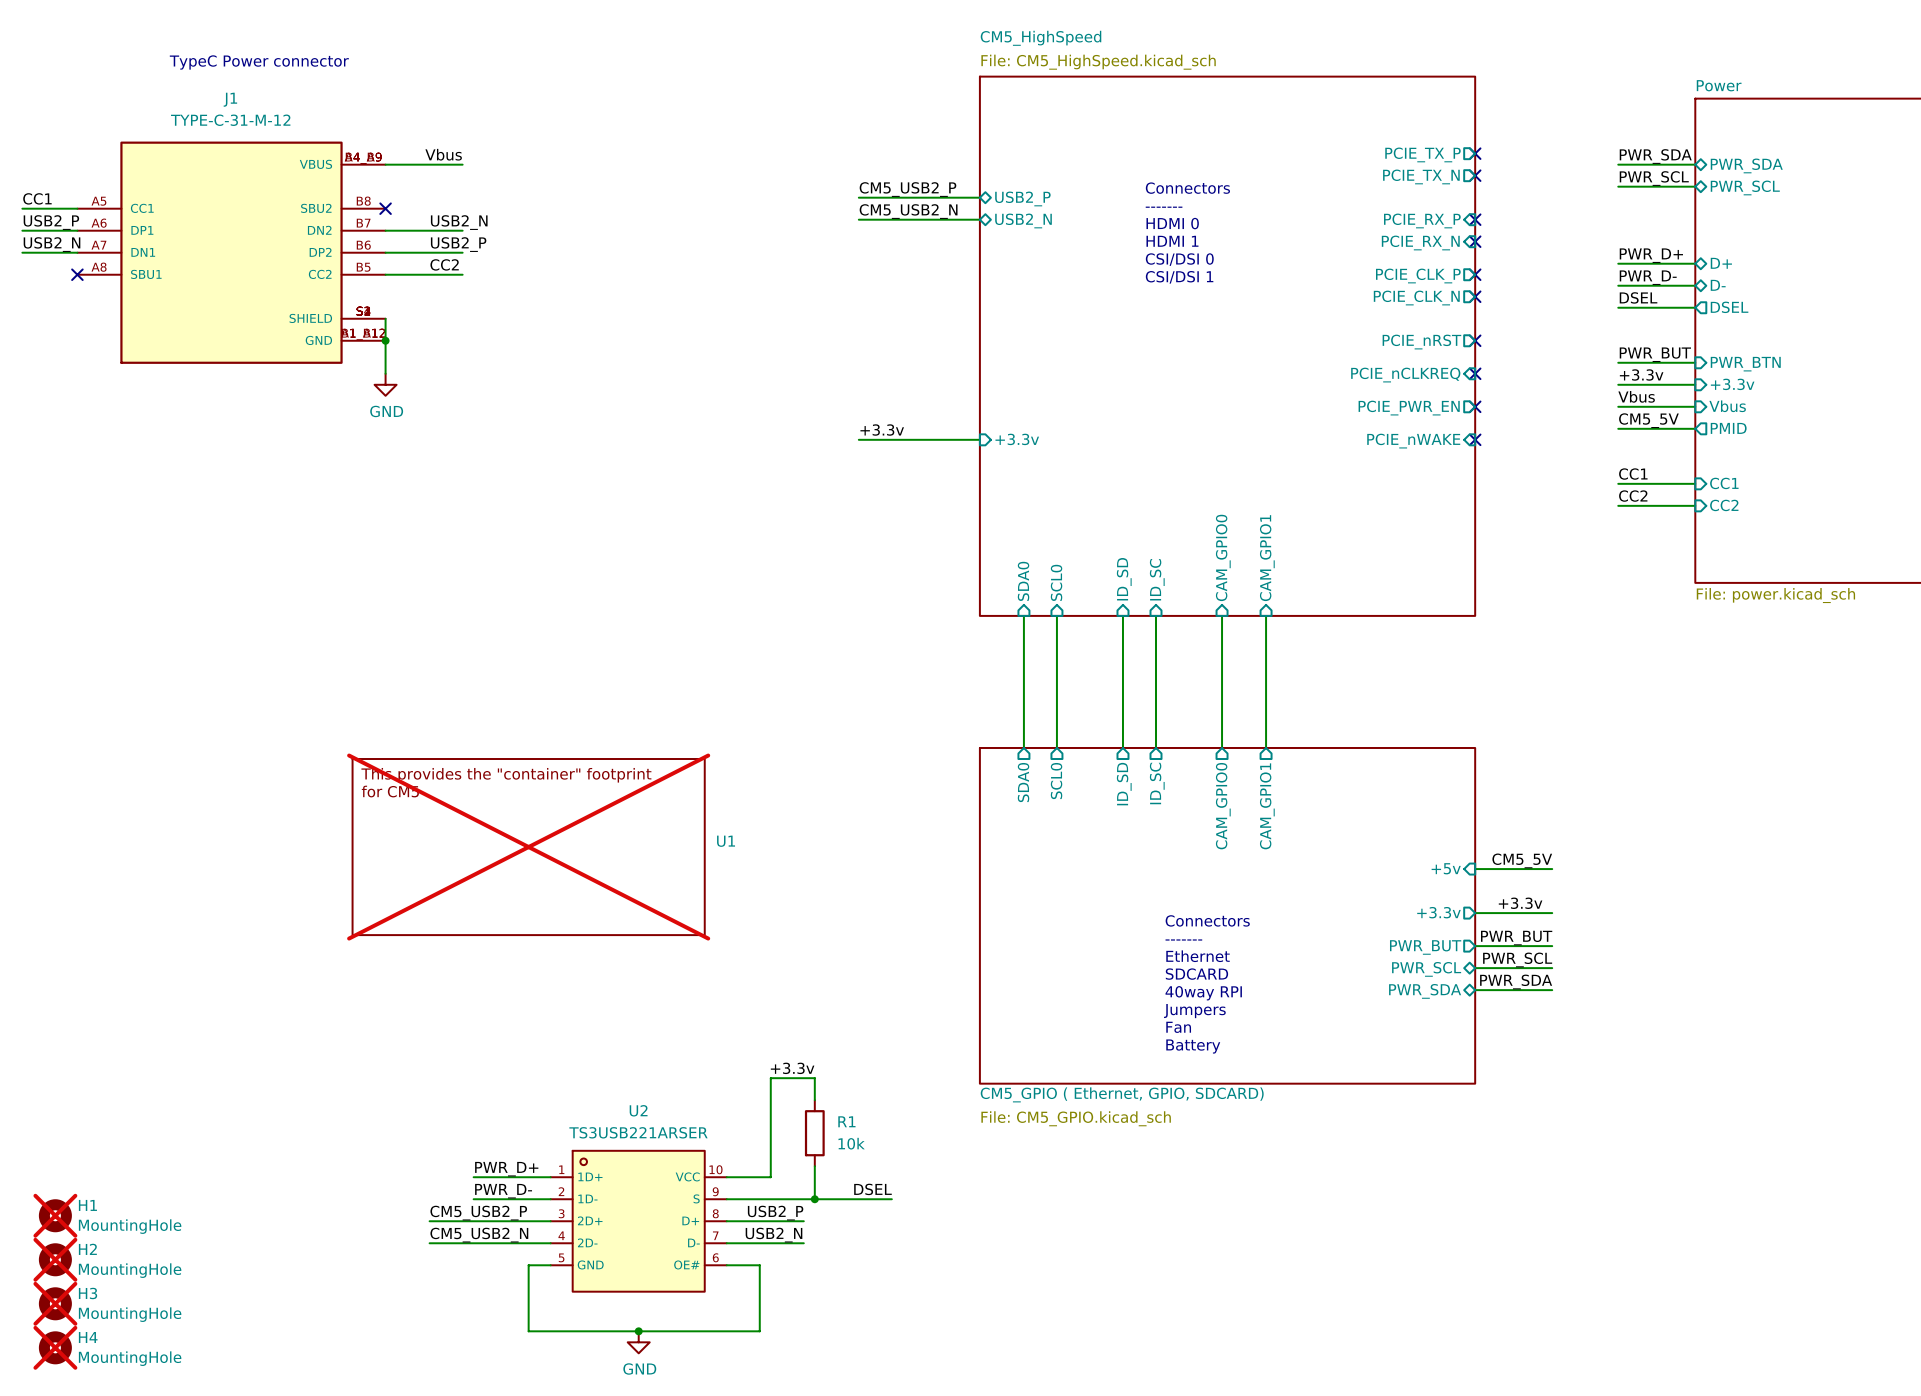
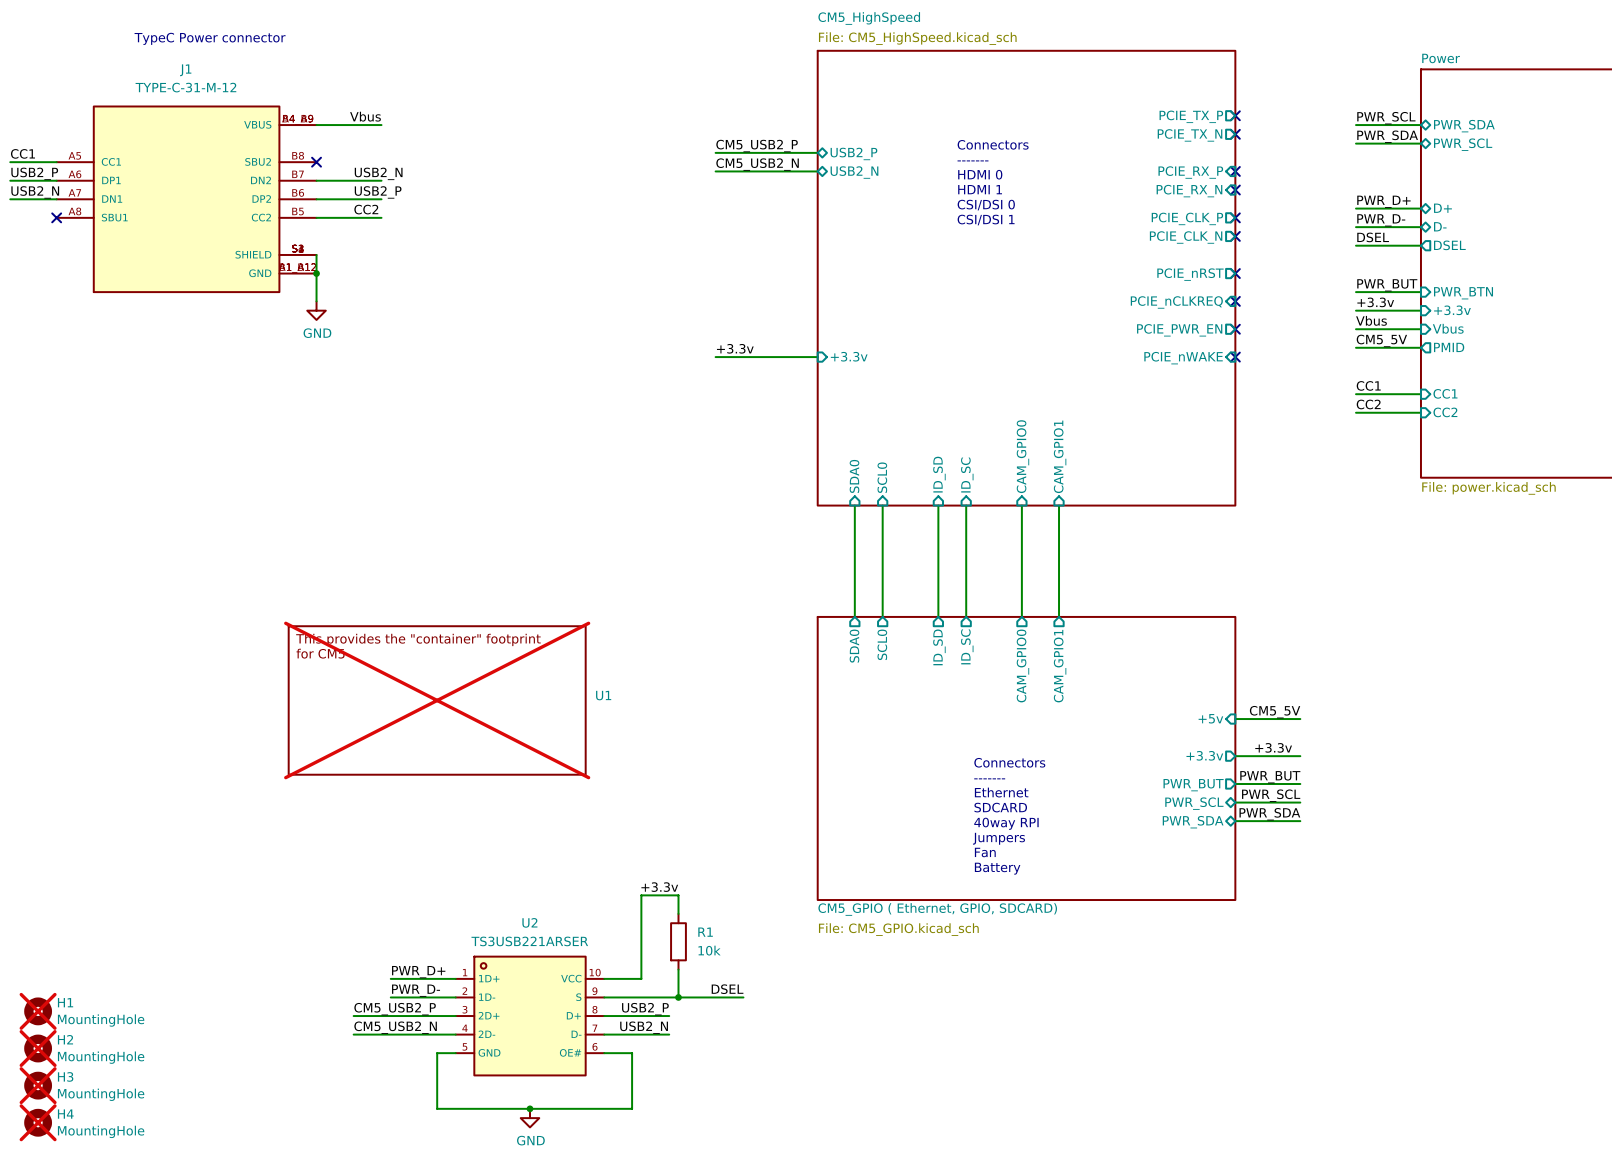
label: PWR_SDA (1655, 156) -> PWR_SCL (1386, 118)
label: PWR_SCL (1654, 178) -> PWR_SDA (1387, 136)

